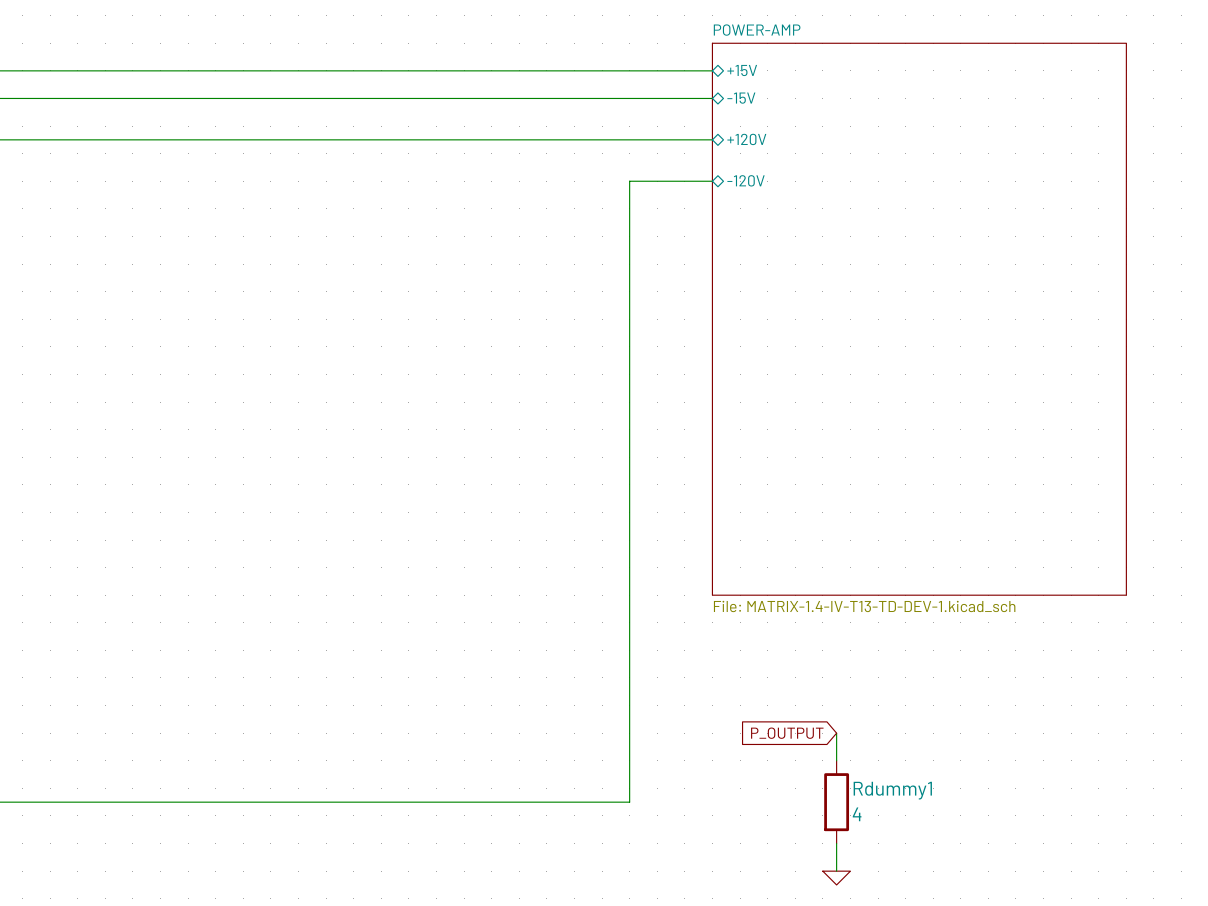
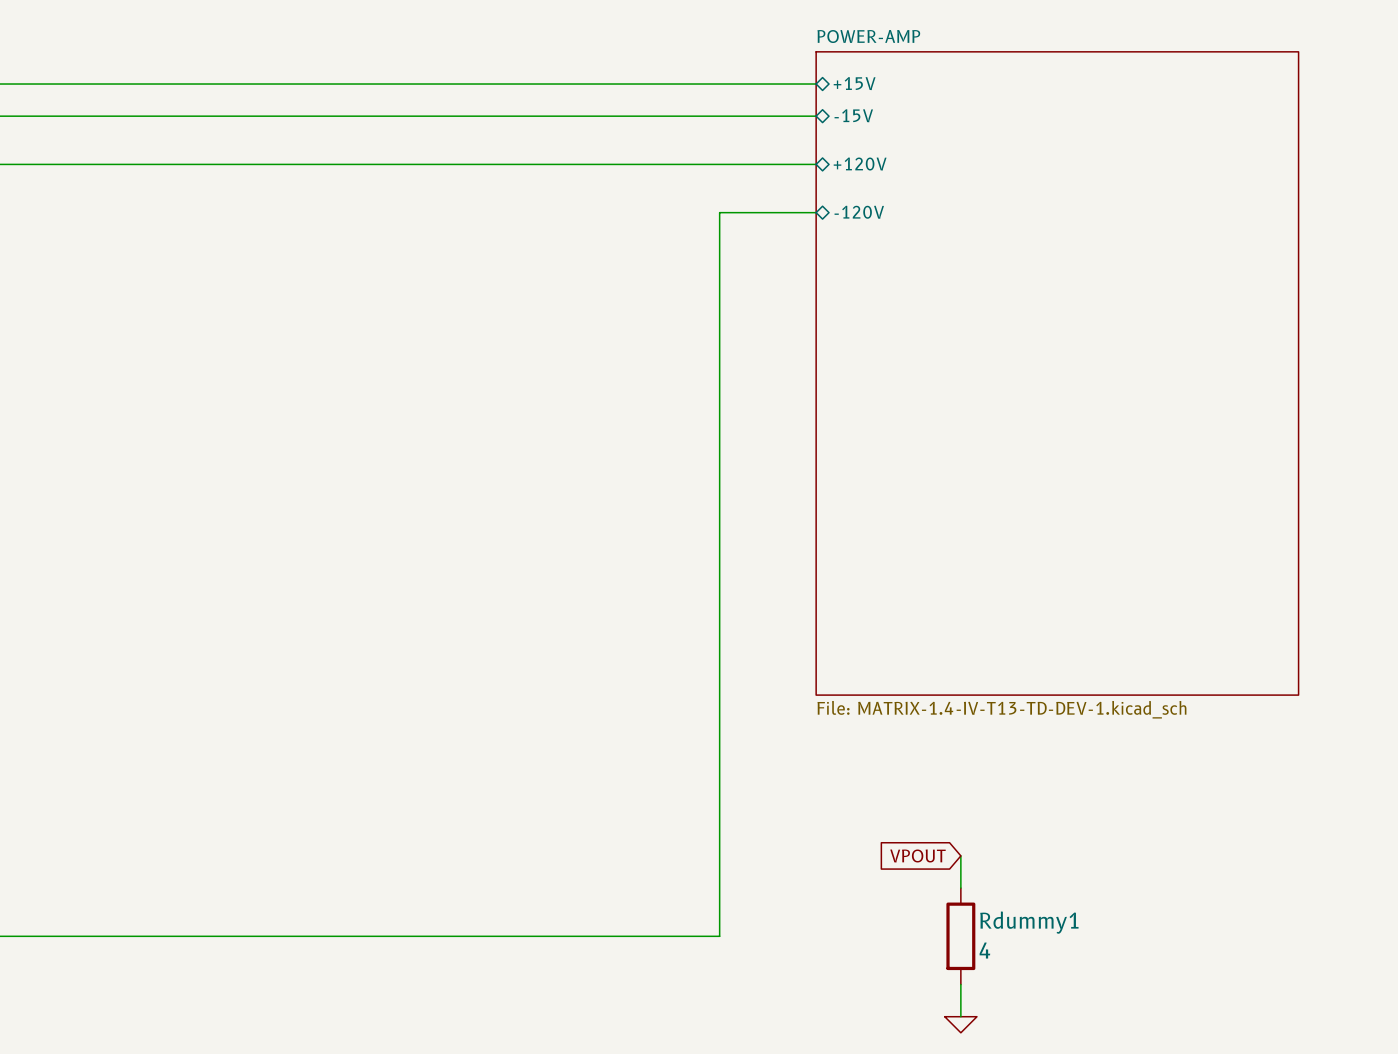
global label: P_OUTPUT (787, 733) -> VPOUT (917, 855)

